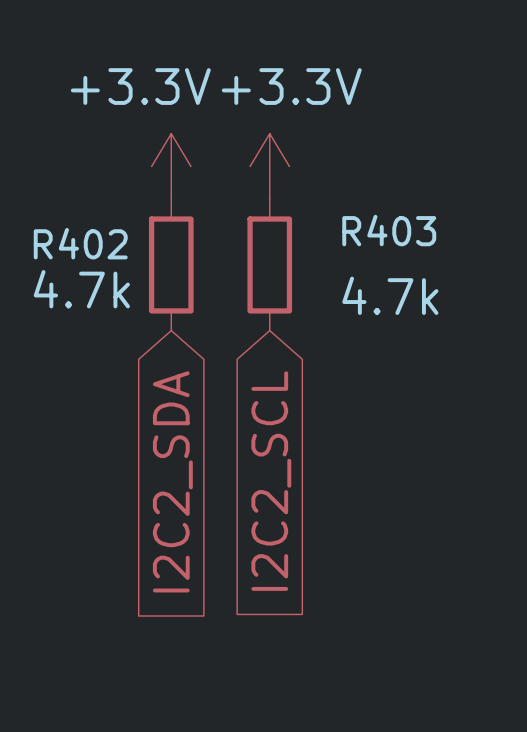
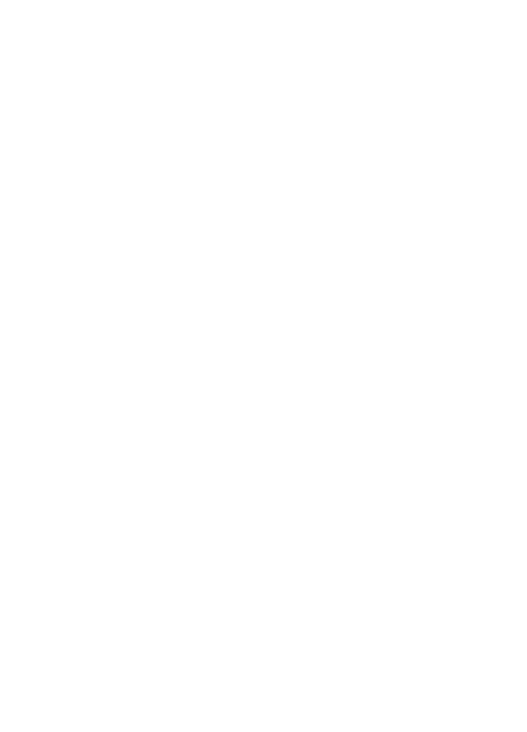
power symbol: +3.3V (171, 166) -> none
power symbol: +3.3V (269, 166) -> none
R402: 4.7k (171, 264) -> none
R403: 4.7k (269, 264) -> none
global label: I2C2_SDA (172, 481) -> none
global label: I2C2_SCL (271, 481) -> none

